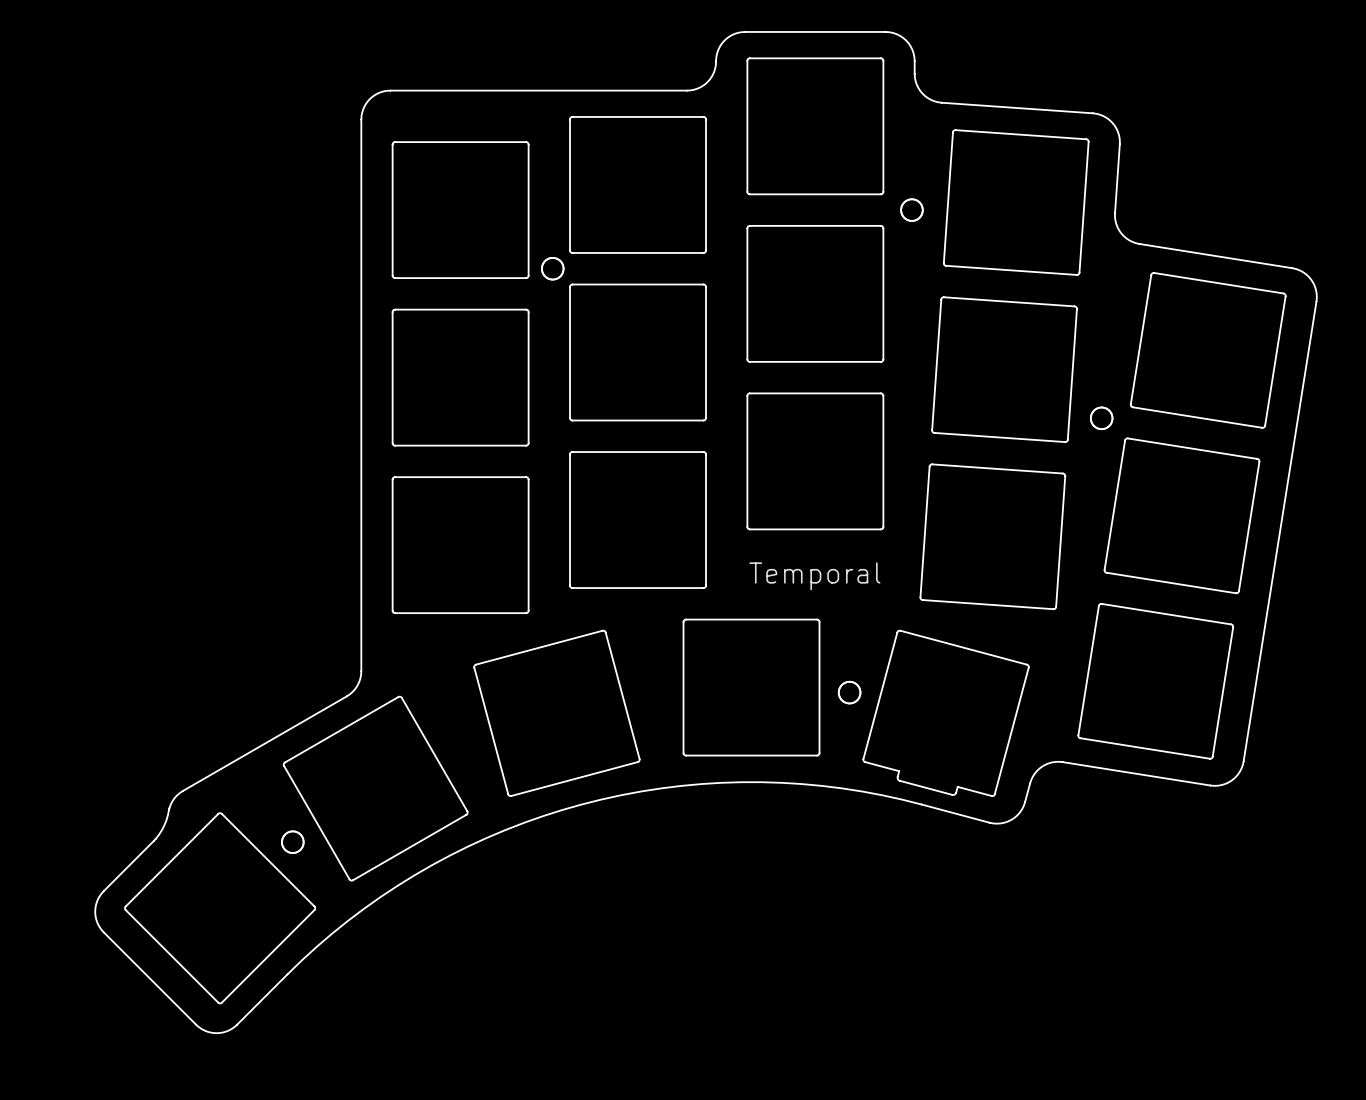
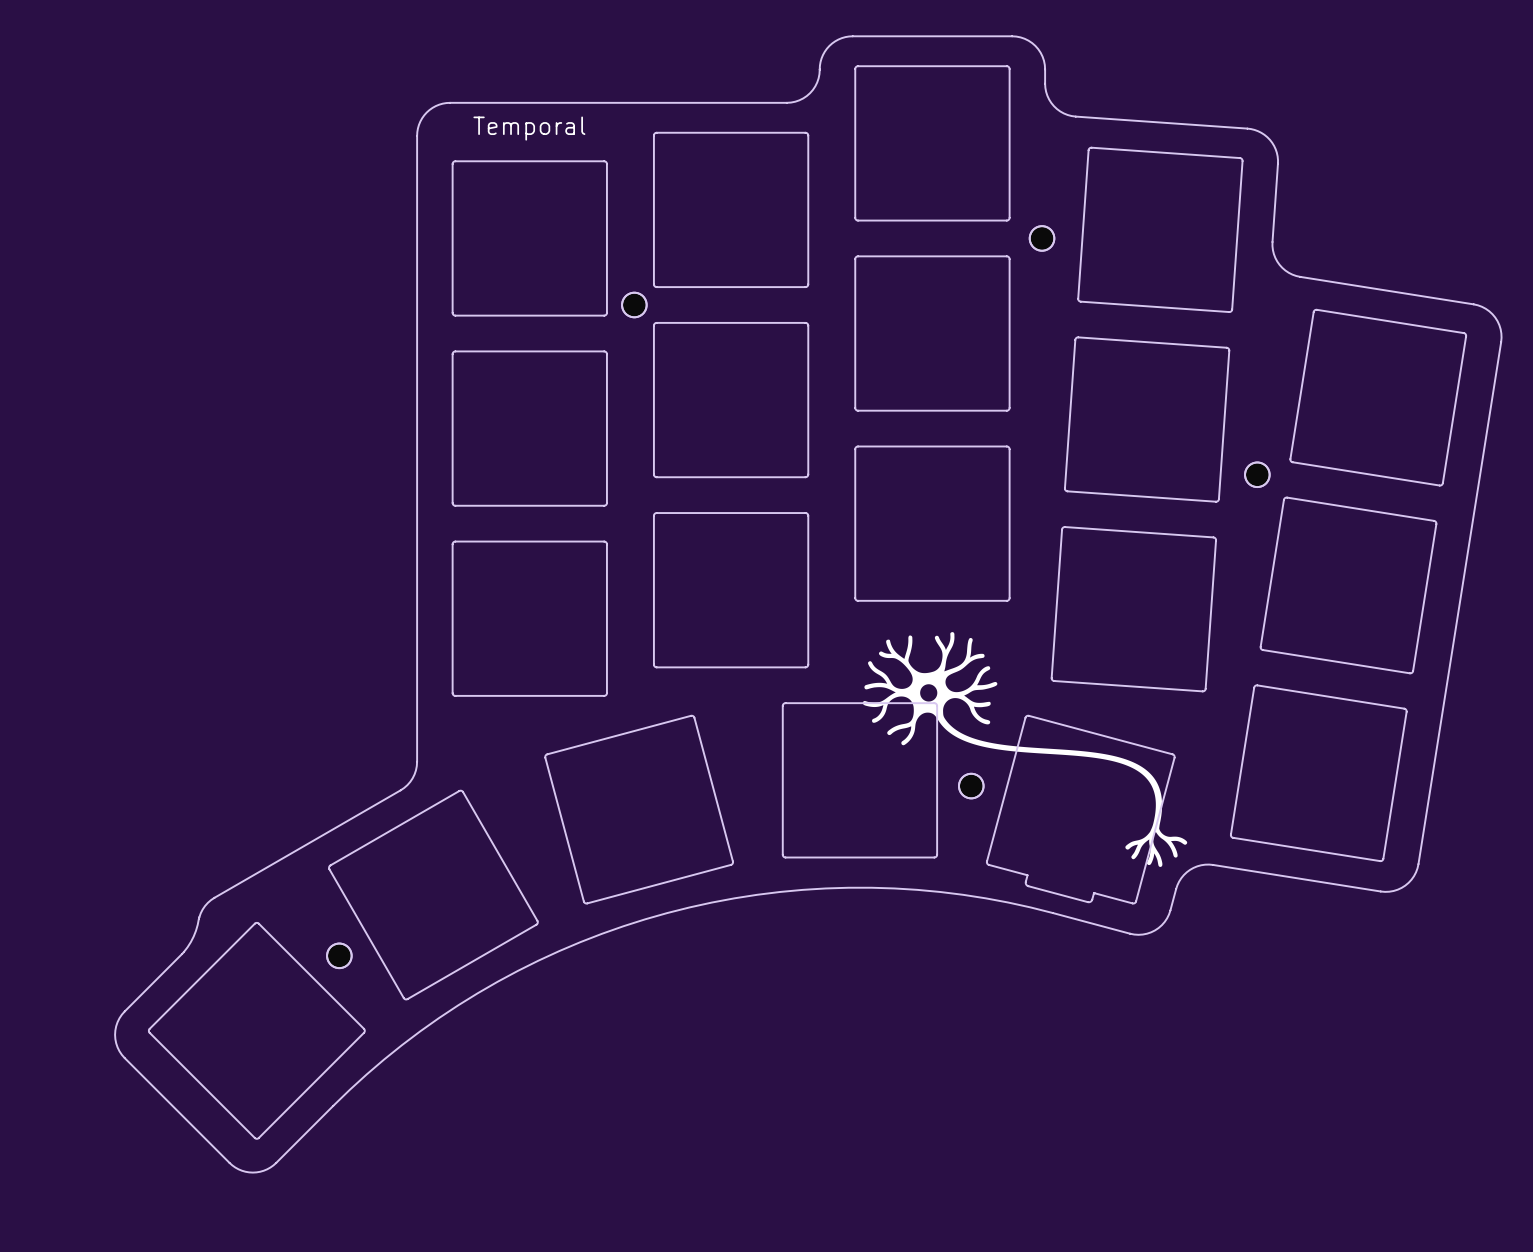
text: none -> Temporal (529, 128)
drawing: none -> [862, 632, 1188, 867]
text: Temporal (814, 576) -> none

